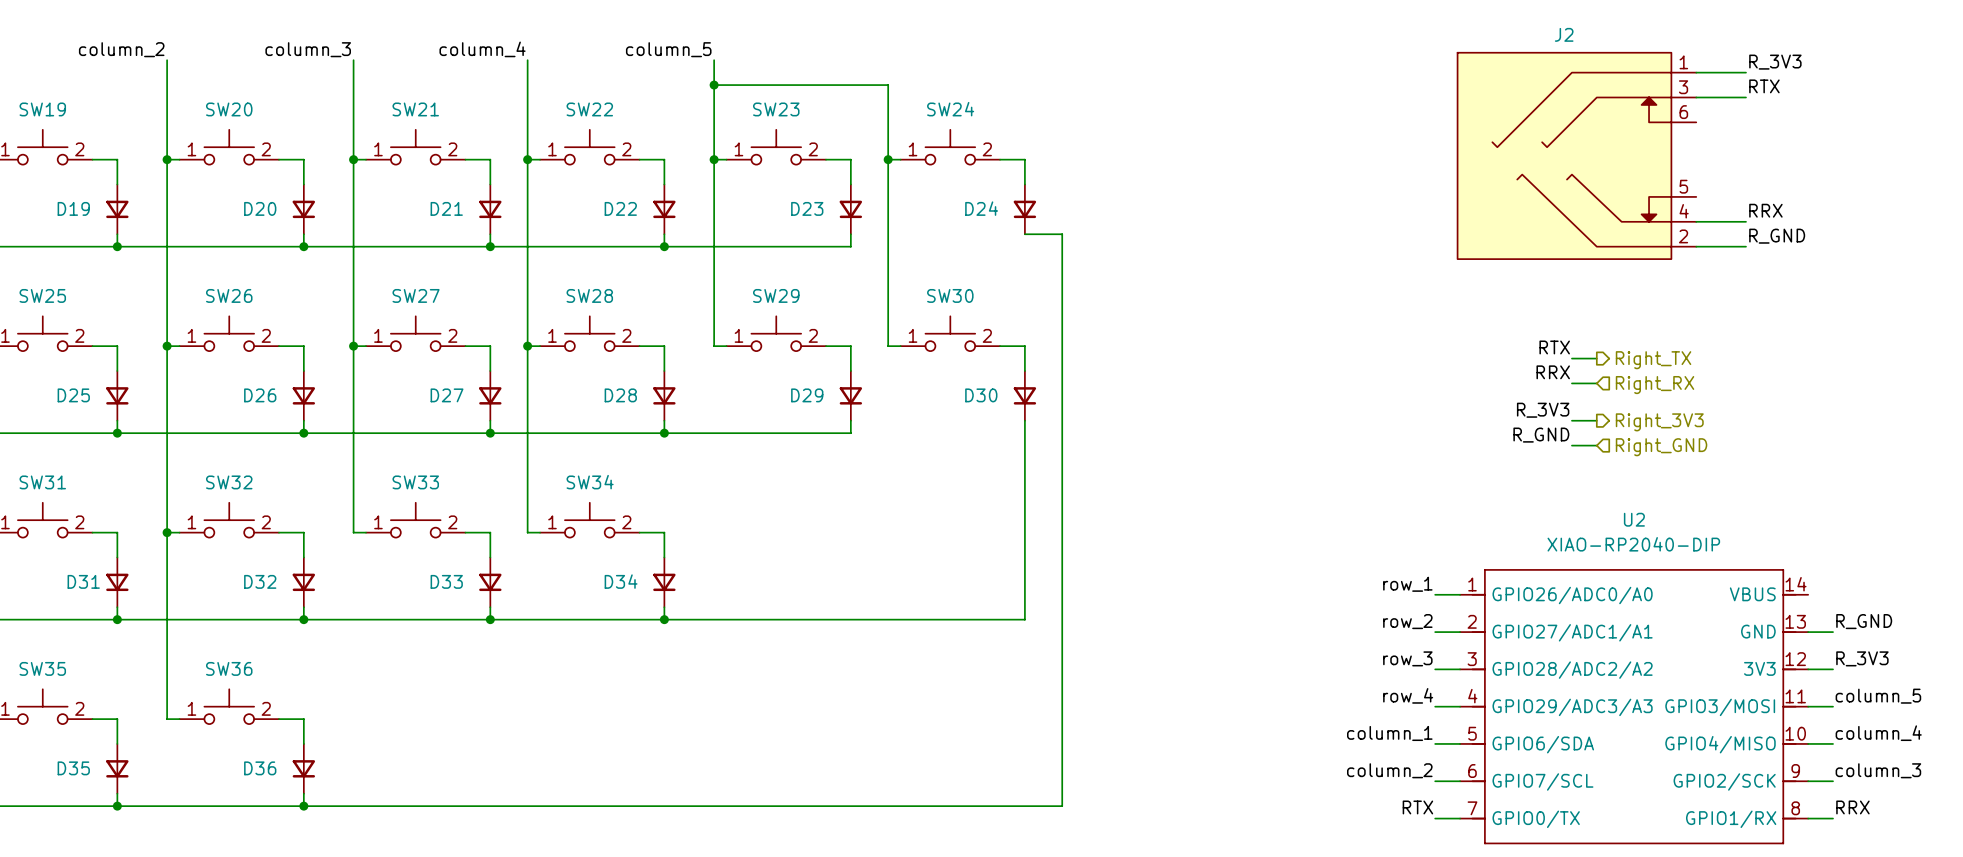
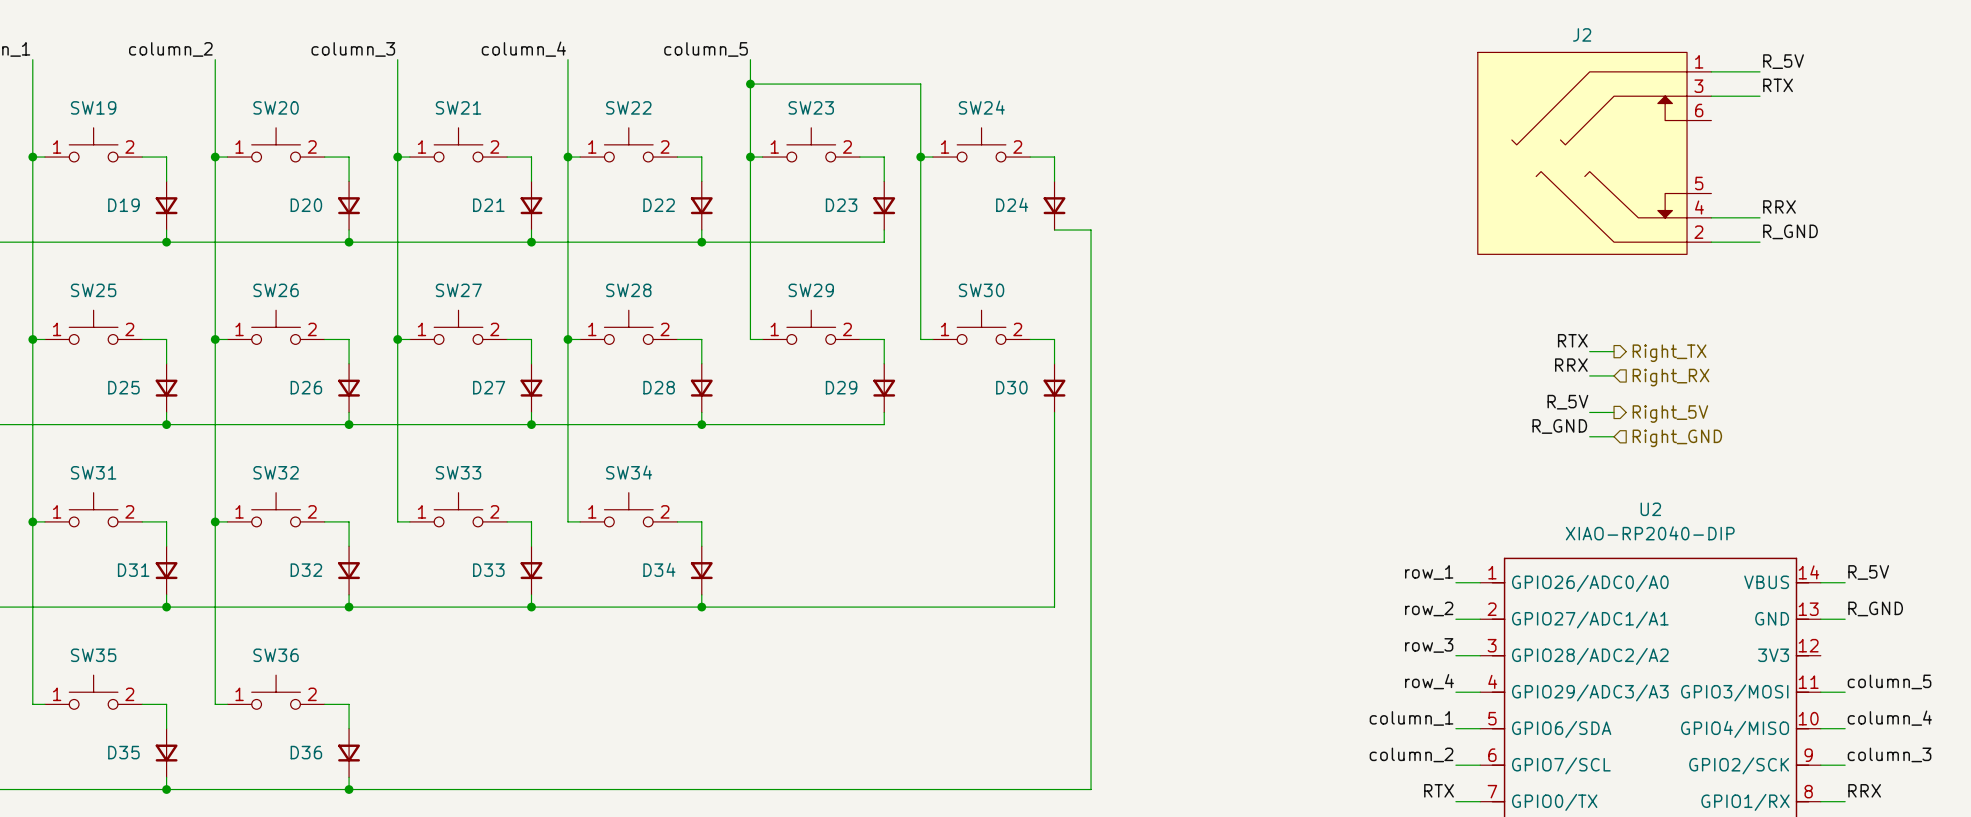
label: R_3V3 (1775, 62) -> R_5V (1783, 61)
label: R_3V3 (1543, 410) -> R_5V (1567, 402)
hierarchical label: Right_3V3 (1659, 422) -> Right_5V (1670, 414)
label: none -> R_5V (1868, 572)
label: R_3V3 (1862, 658) -> none
wire: (1808, 669) (1833, 669) -> (1820, 582) (1845, 582)

